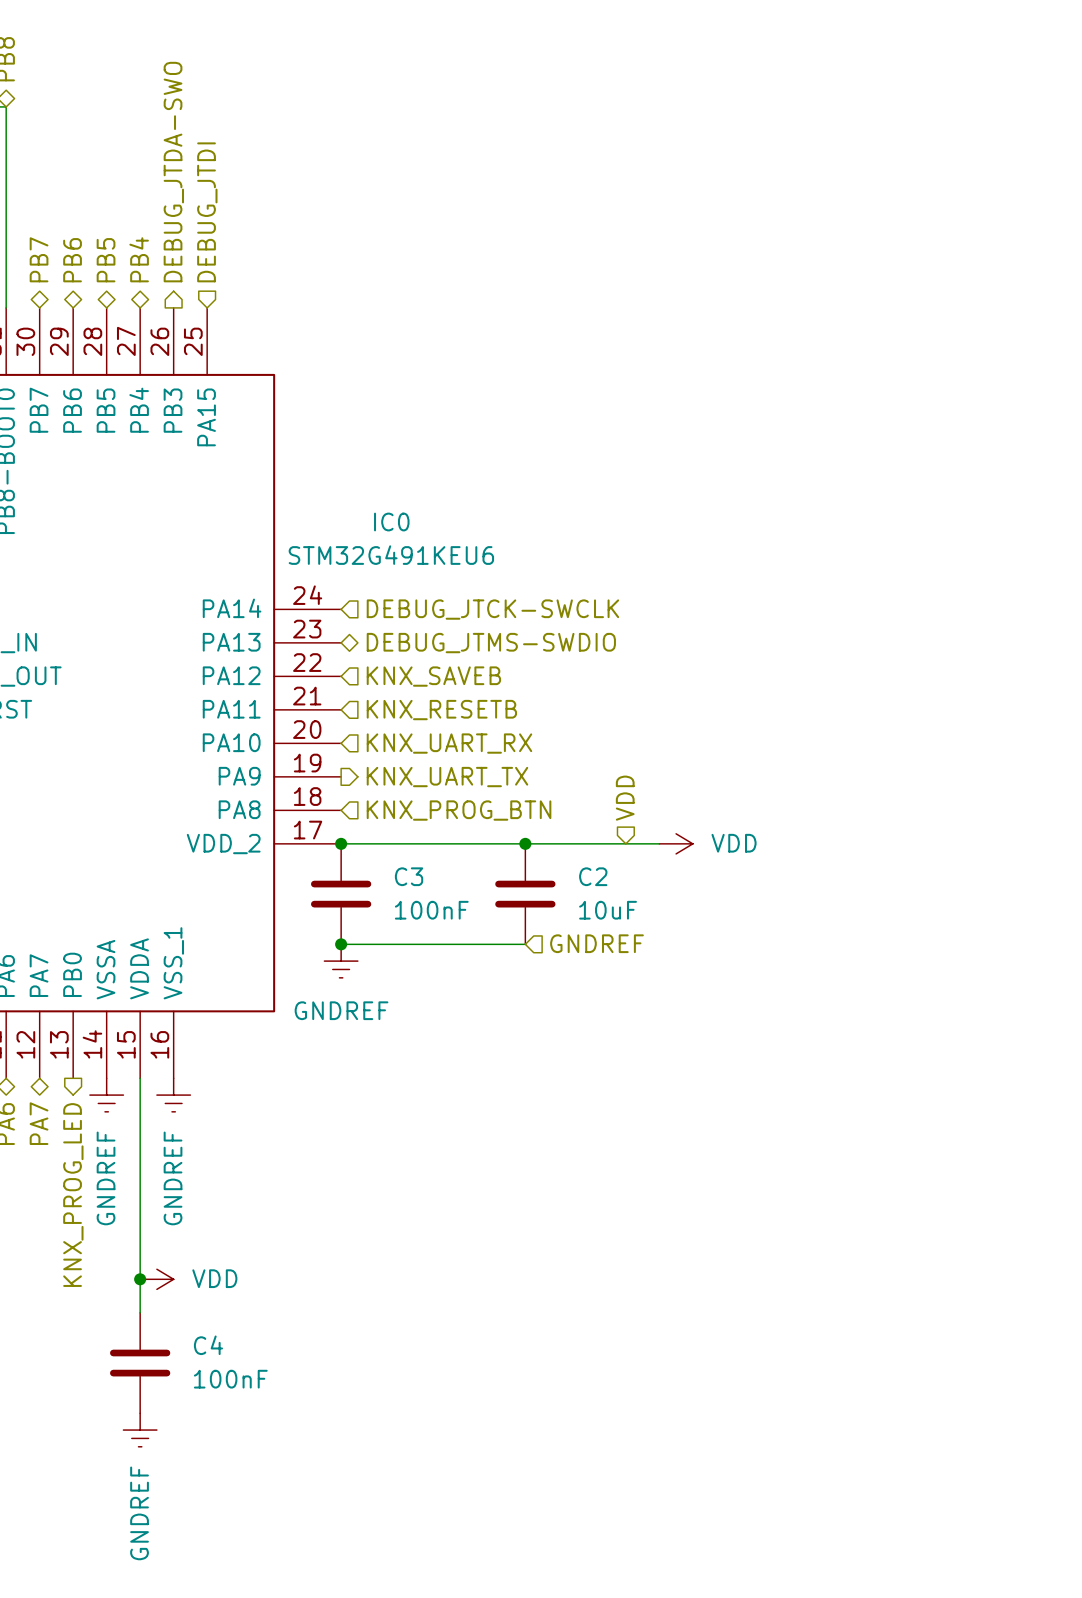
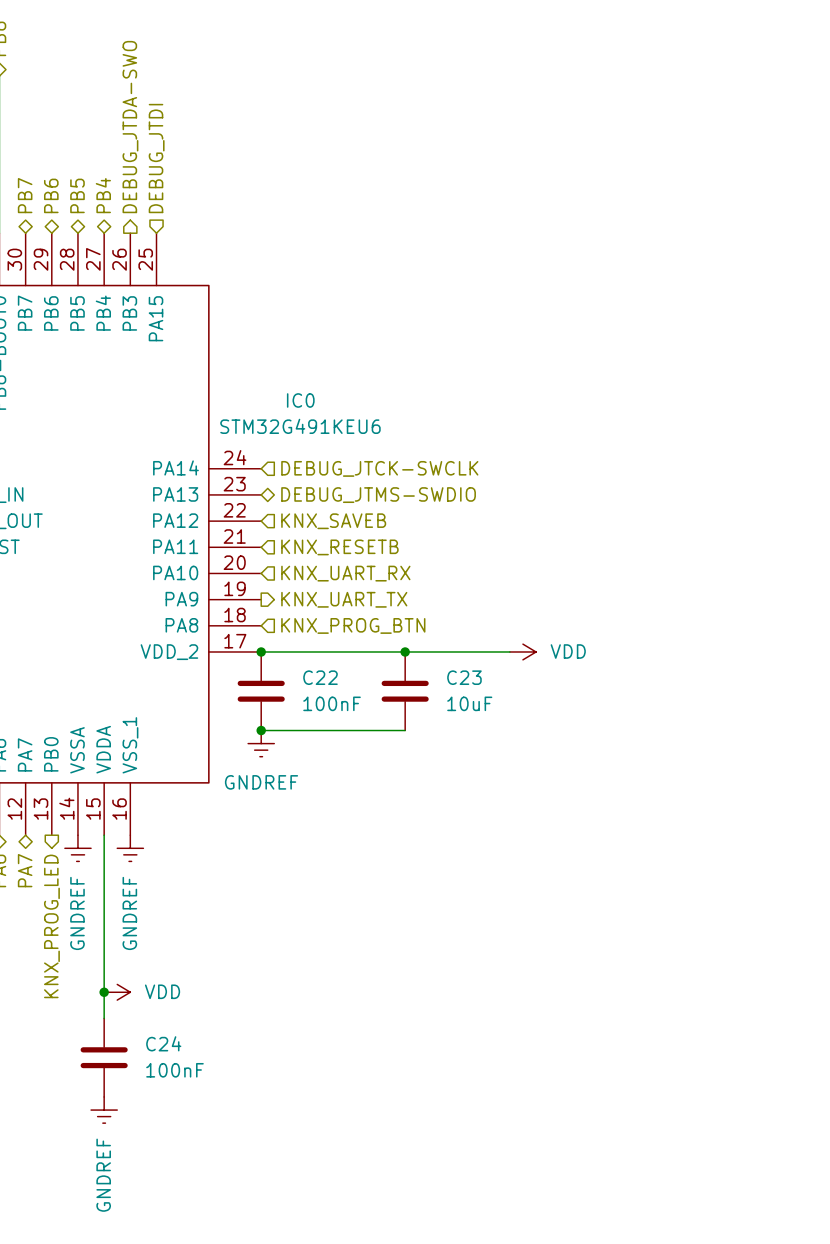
hierarchical label: VDD (625, 798) -> none
C3 name: C3 (409, 876) -> C22 (320, 677)
C2 name: C2 (593, 876) -> C23 (464, 677)
hierarchical label: GNDREF (597, 943) -> none
C4 name: C4 (208, 1345) -> C24 (163, 1043)

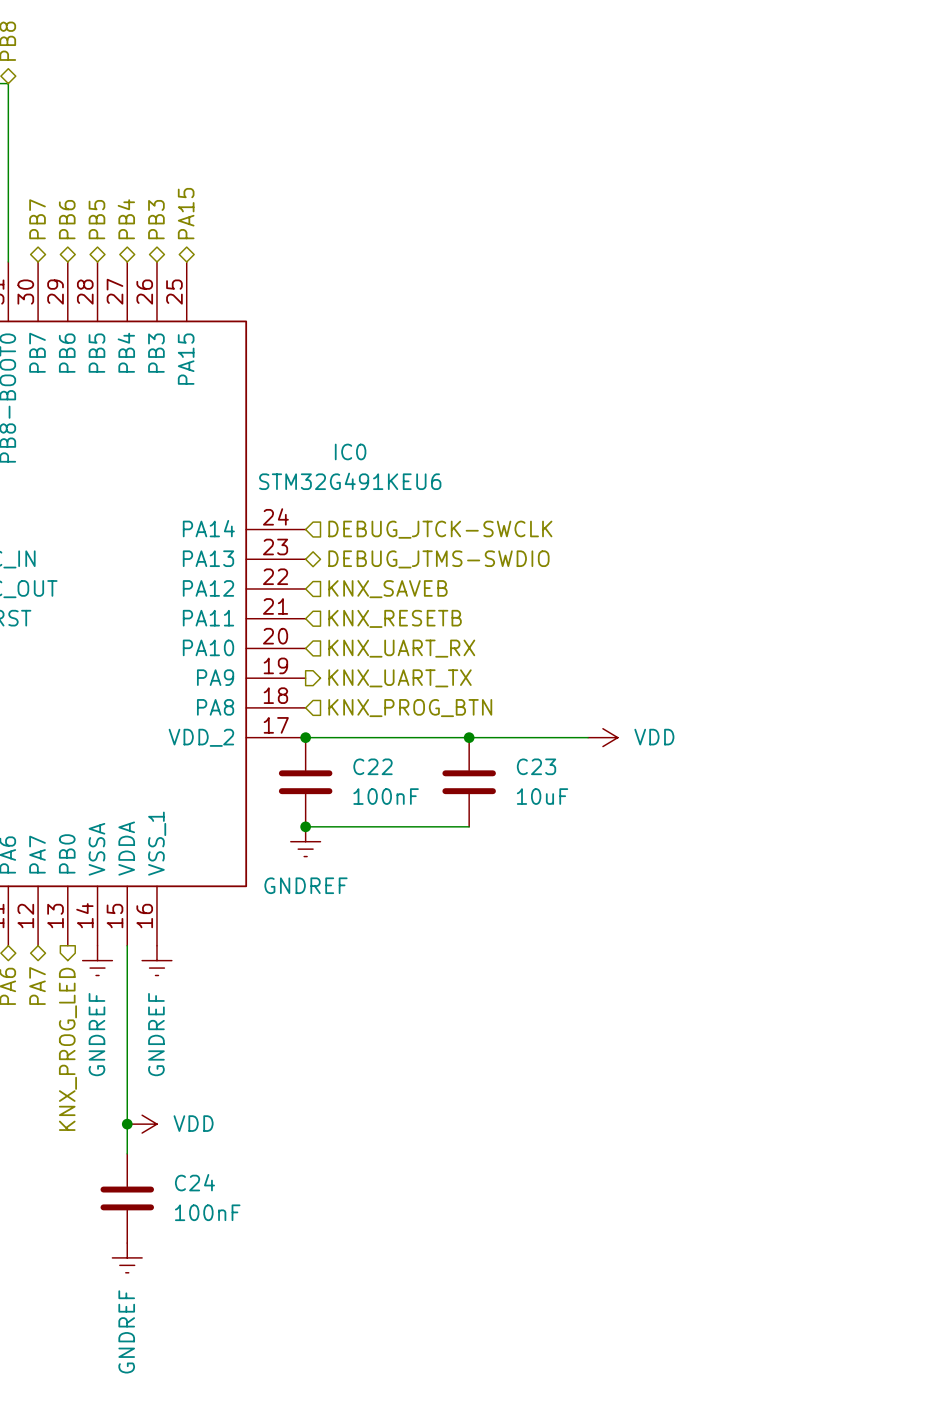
hierarchical label shape: output (130, 127) -> bidirectional (156, 219)
hierarchical label: DEBUG_JTDA-SWO (130, 127) -> PB3 (156, 219)
hierarchical label shape: input (156, 158) -> bidirectional (186, 213)
hierarchical label: DEBUG_JTDI (156, 158) -> PA15 (186, 213)

